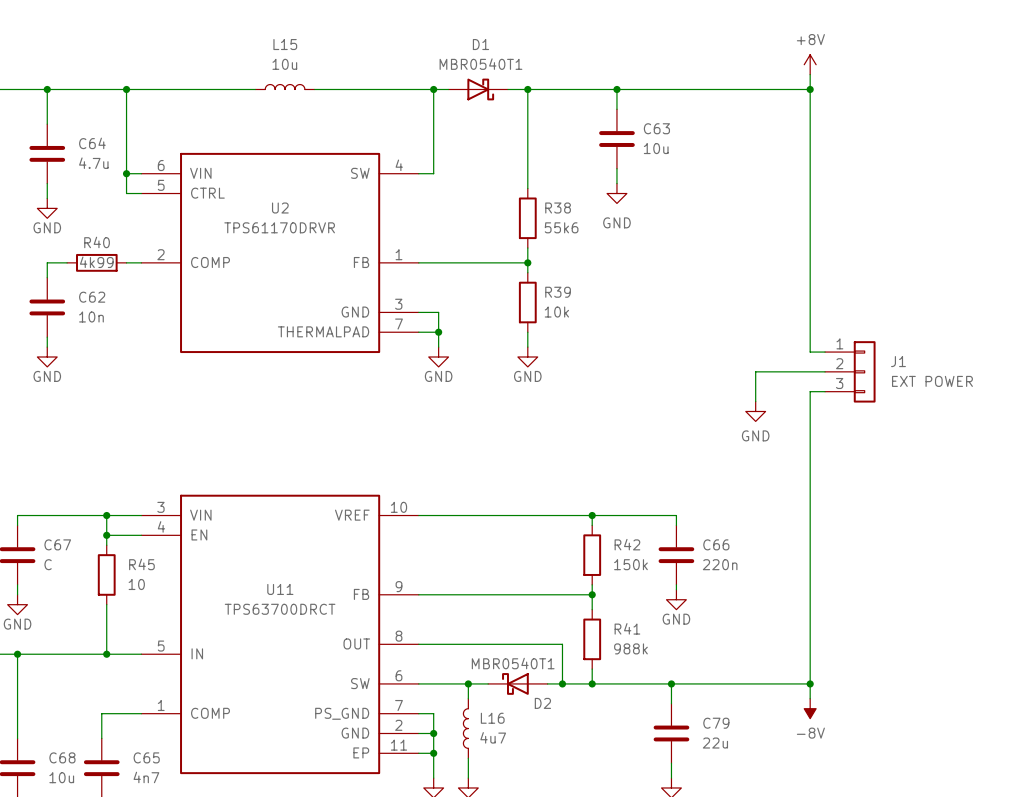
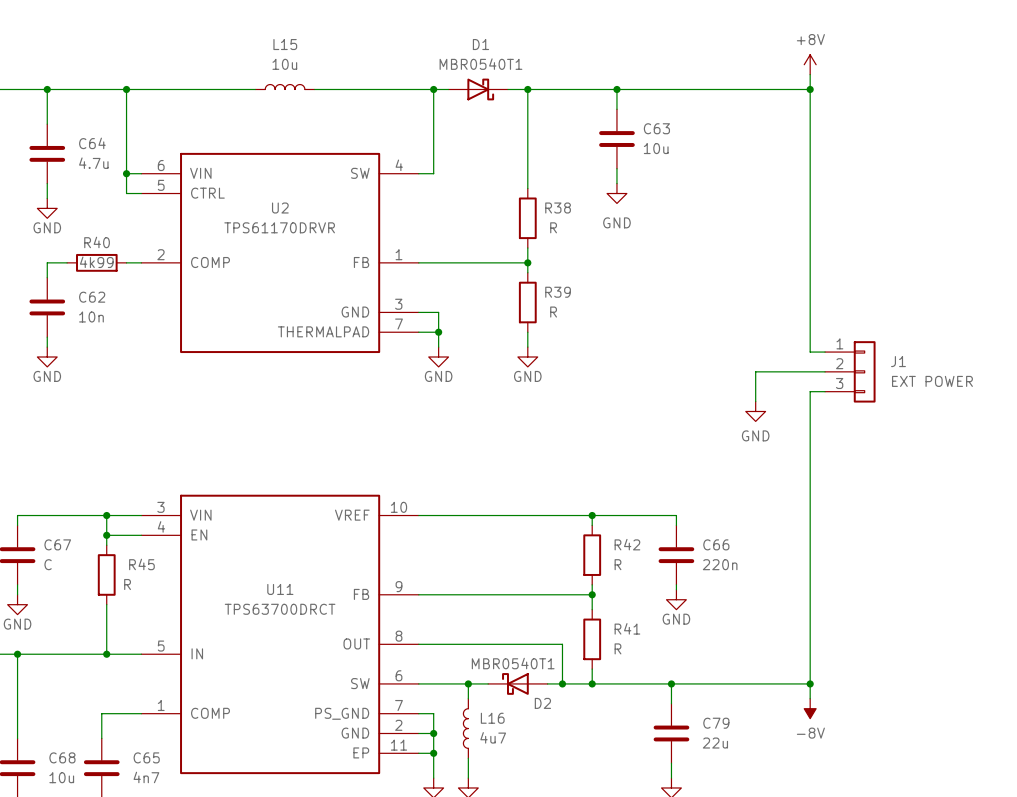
R38 value: 55k6 (561, 227) -> R (553, 227)
R39 value: 10k (556, 312) -> R (553, 312)
R42 value: 150k (630, 564) -> R (617, 564)
R45 value: 10 (136, 584) -> R (127, 584)
R41 value: 988k (630, 648) -> R (617, 648)

